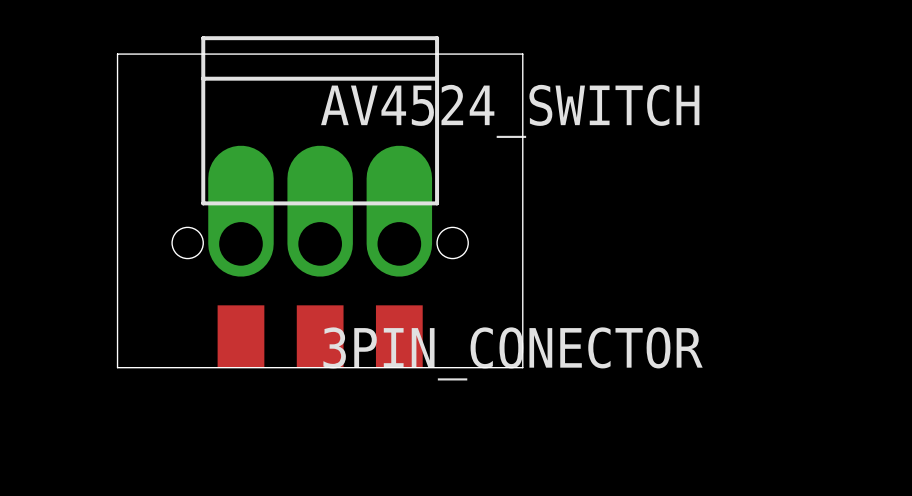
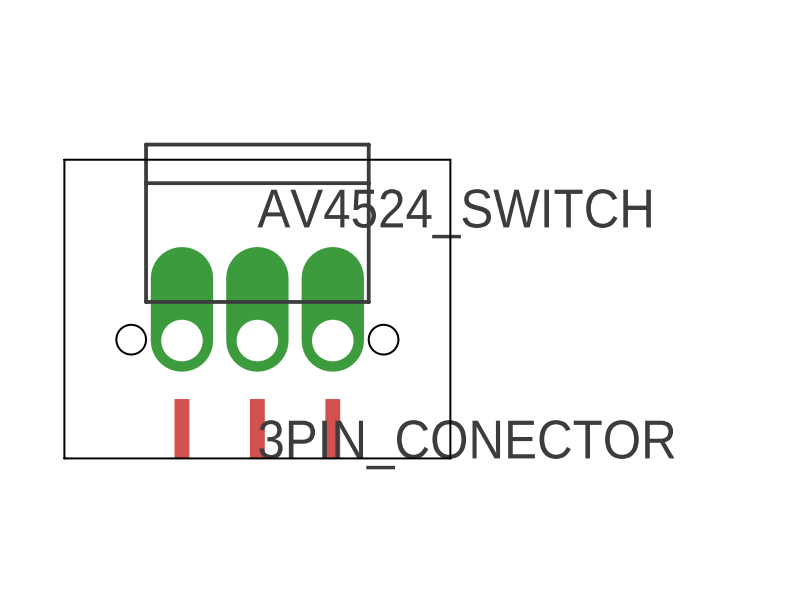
part footprint: [217, 305, 423, 368] -> [174, 399, 341, 459]

